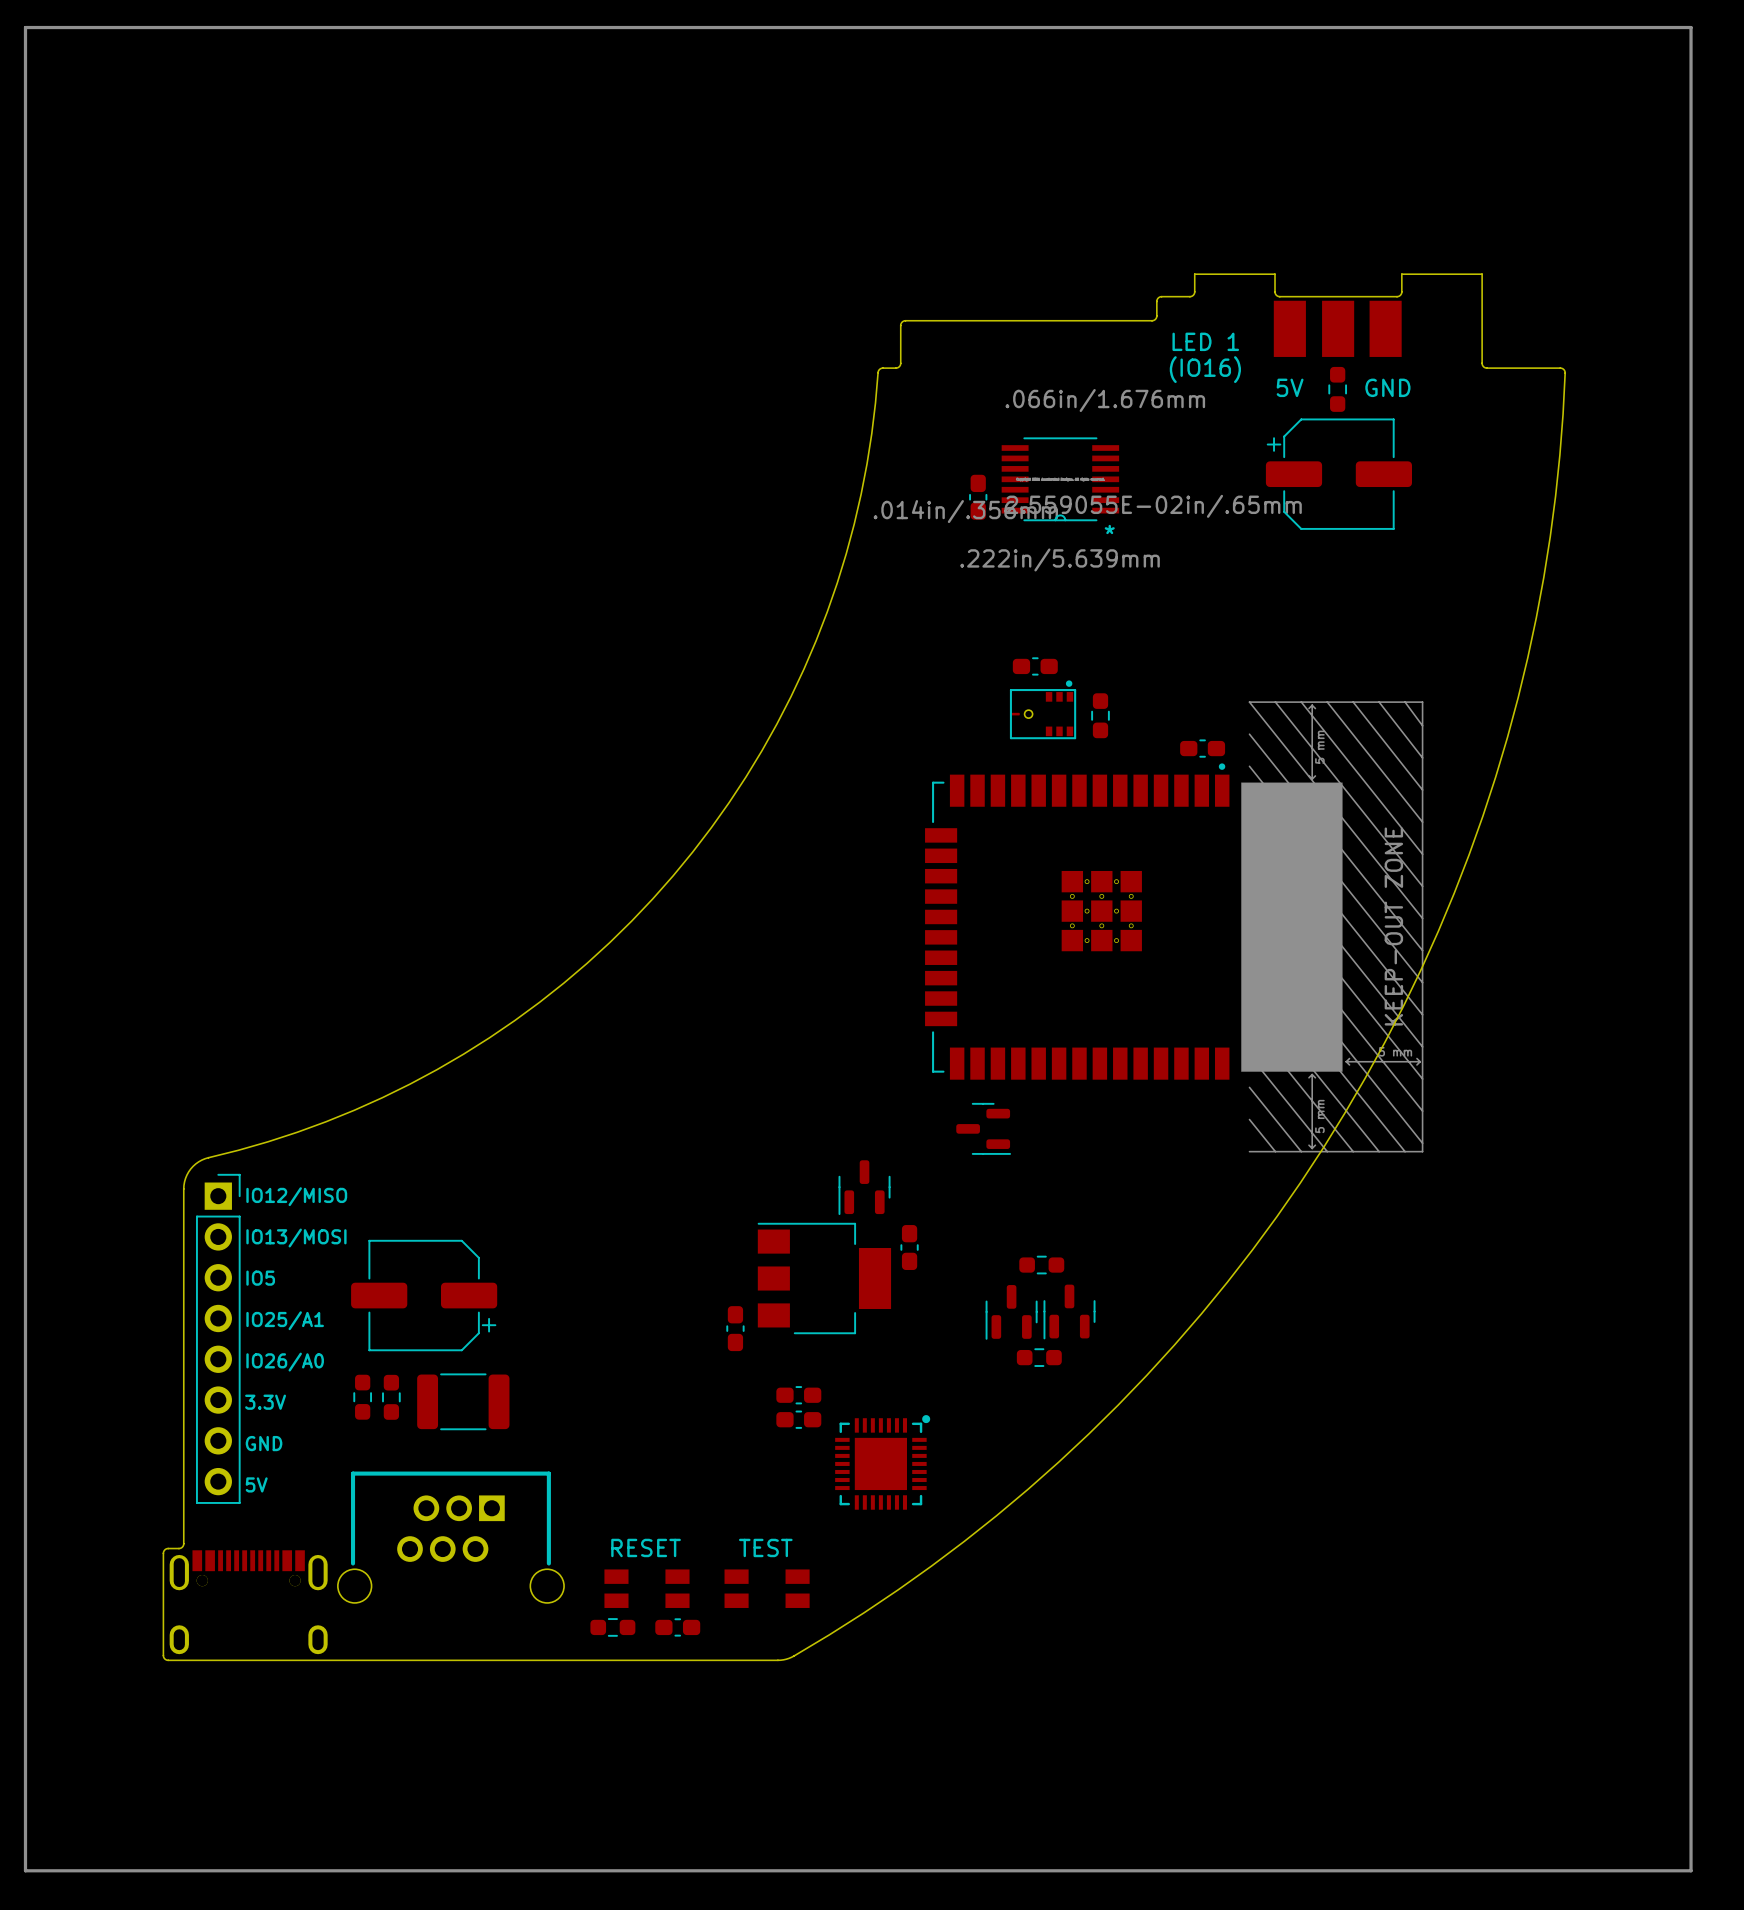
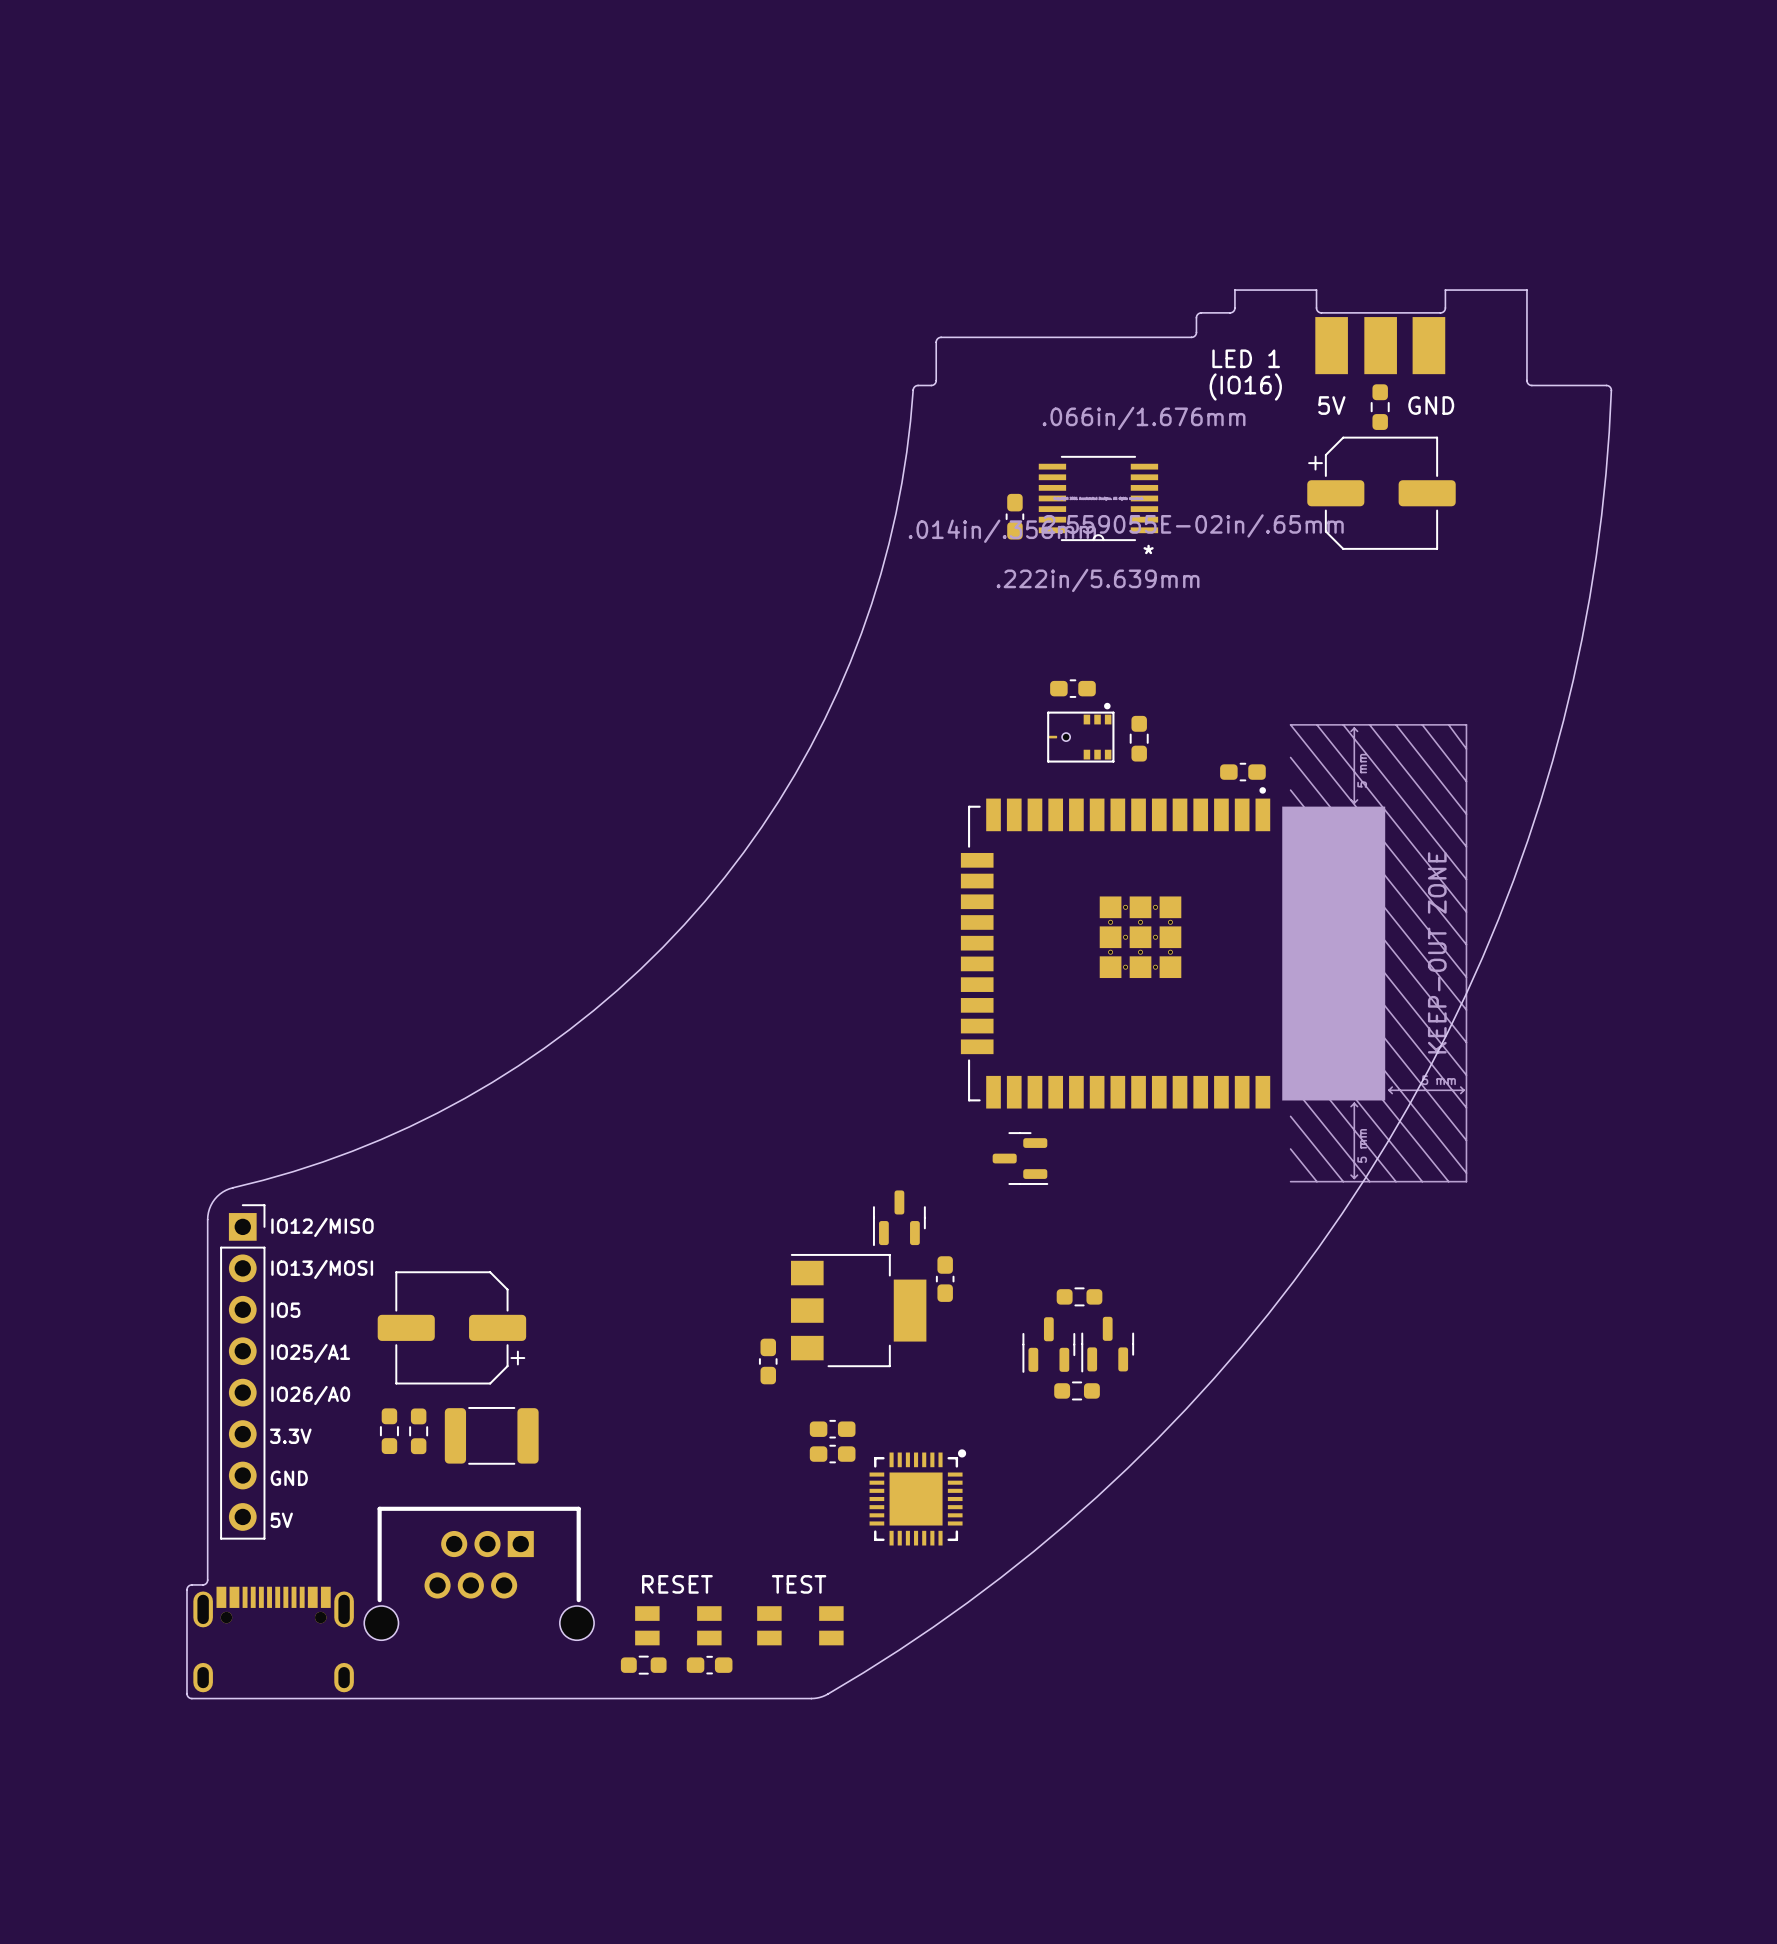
line: (25, 27) (1691, 27) (1691, 1870) (25, 1870) (25, 27) -> none

